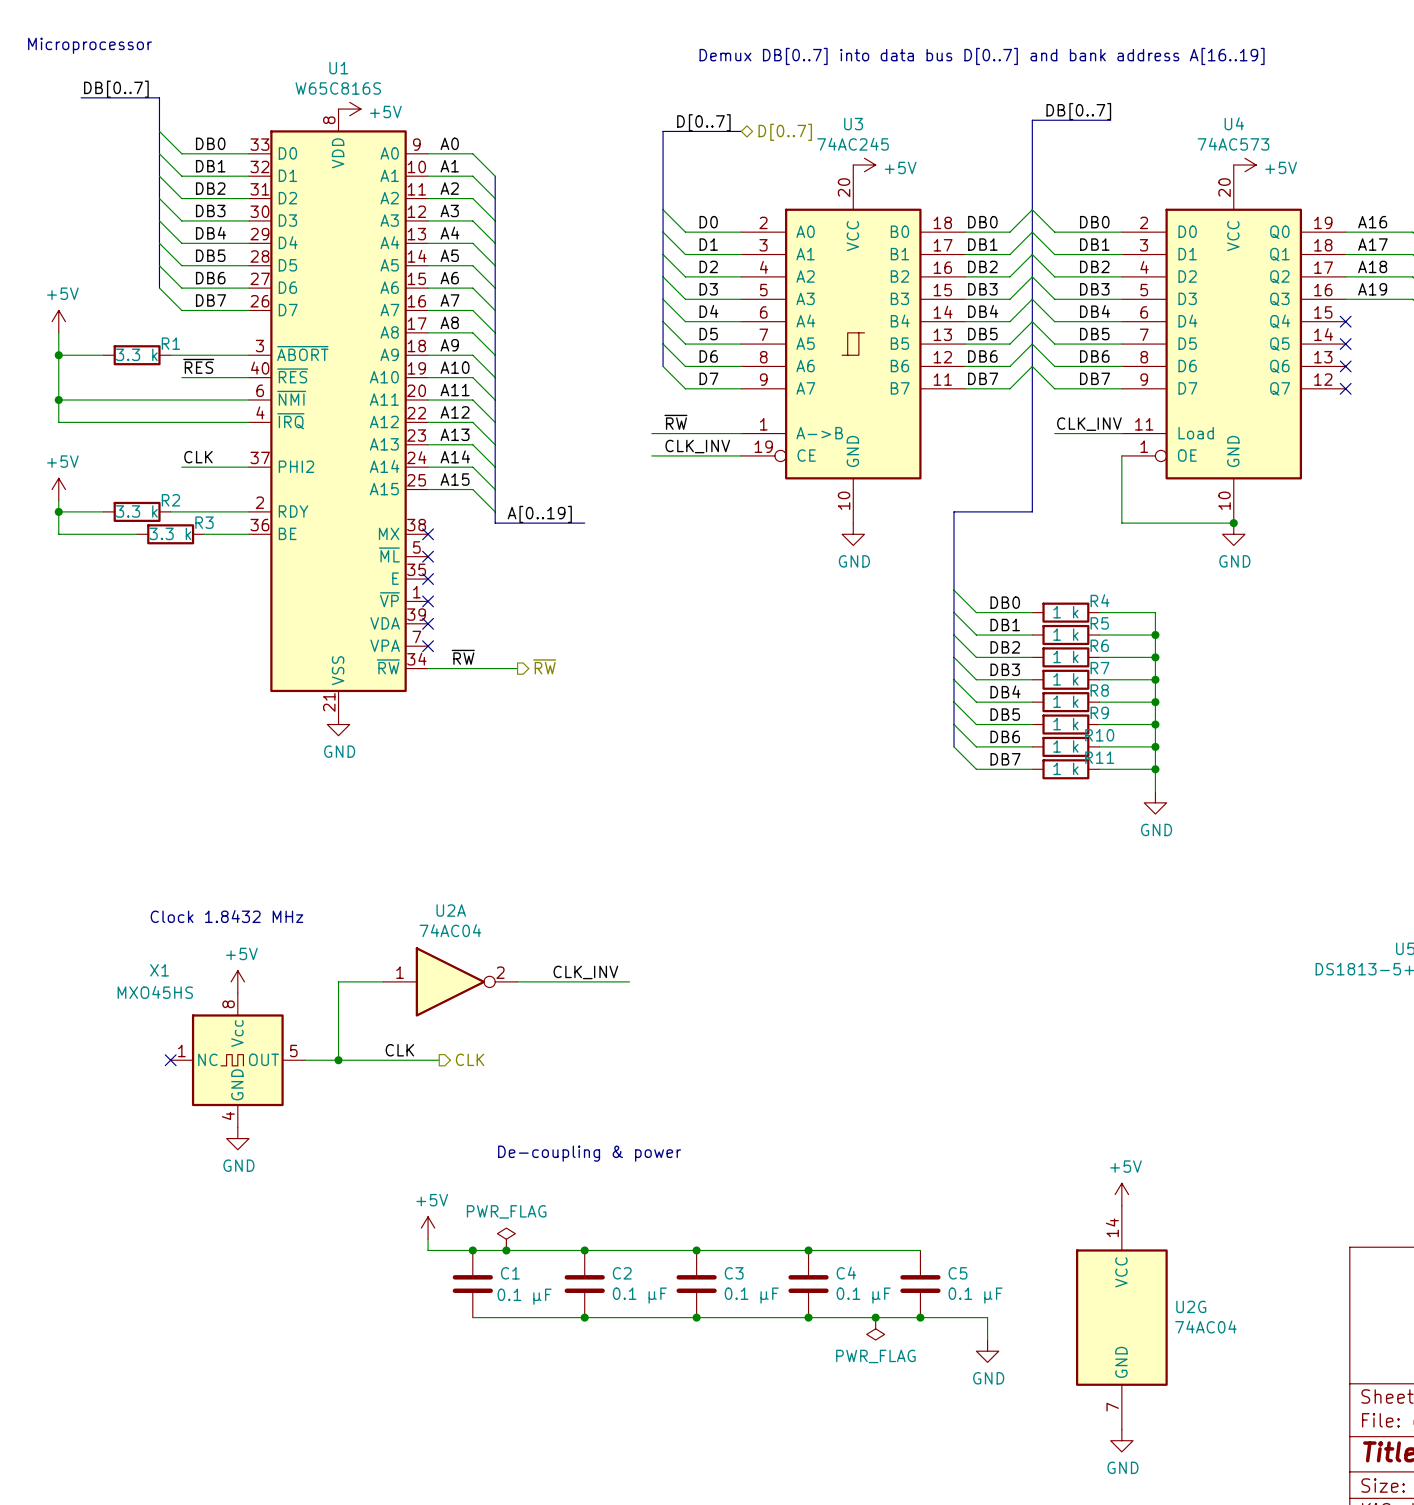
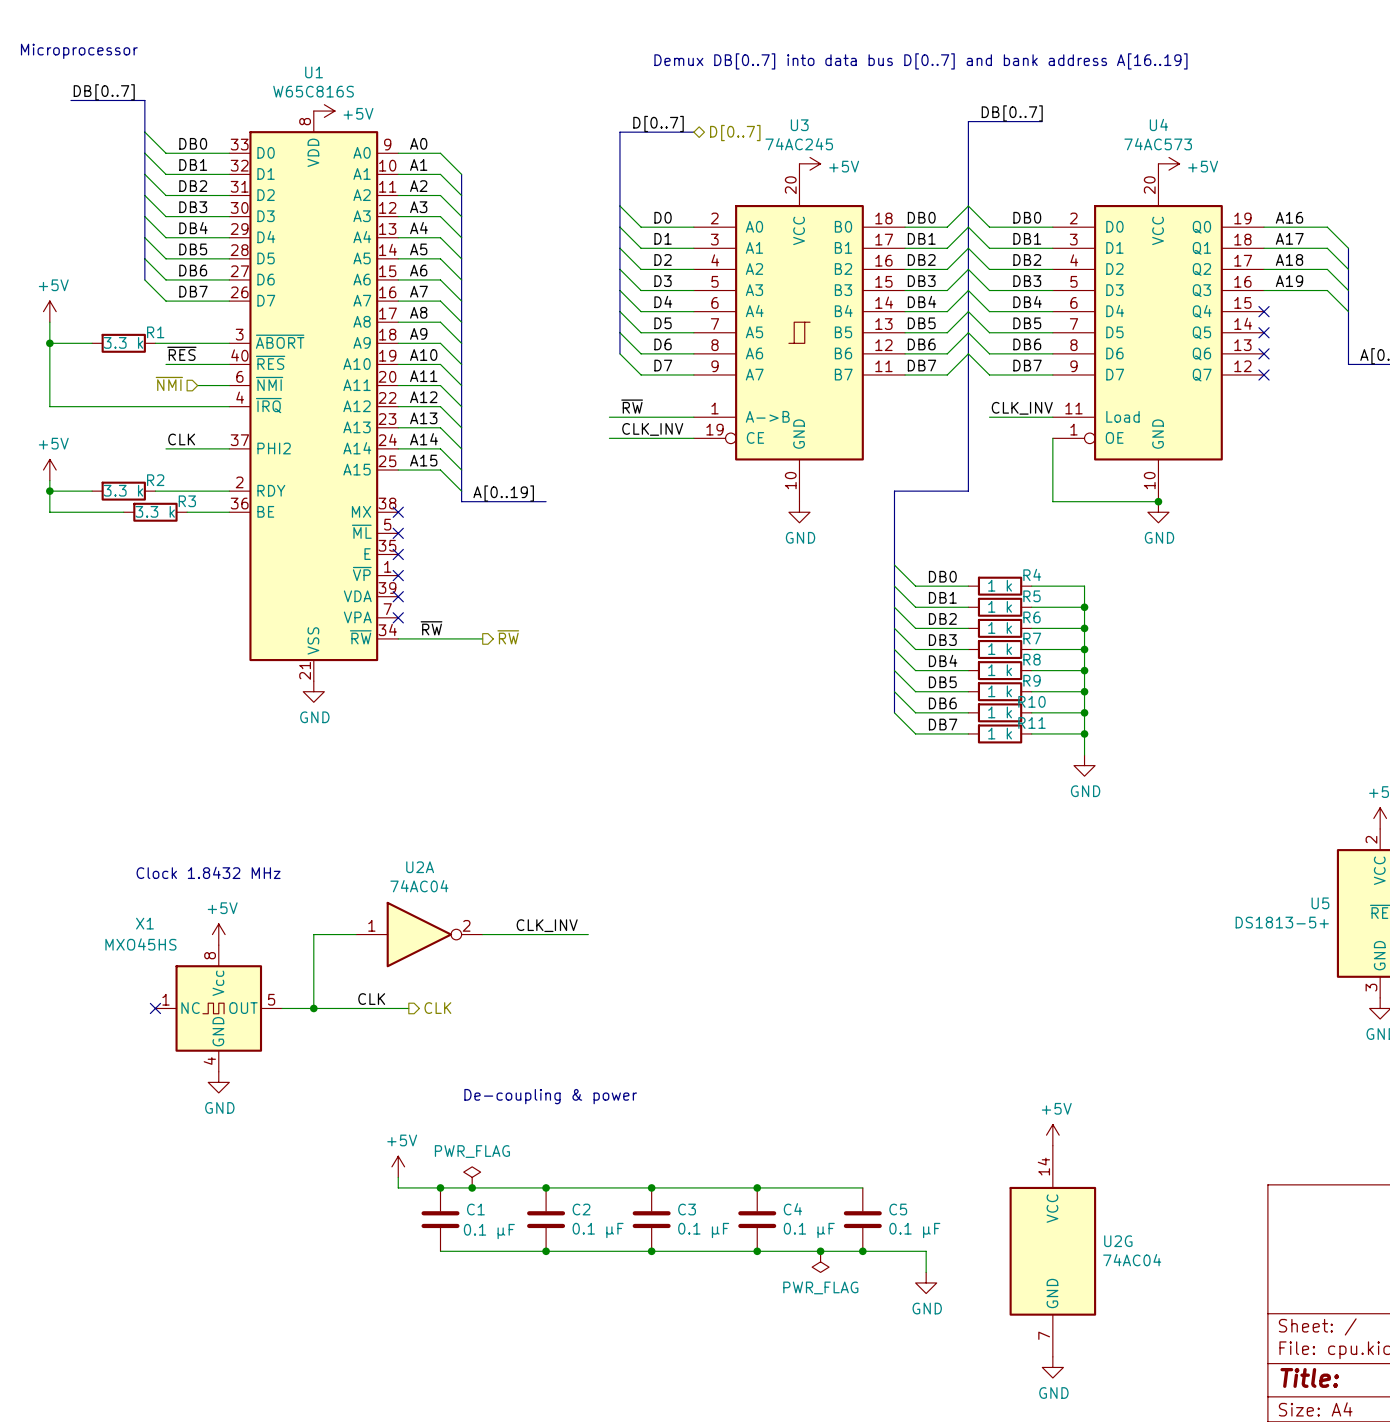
hierarchical label: none -> ~{NMI} (169, 383)
wire: (58, 400) (215, 400) -> none
junction: (58, 400) -> none

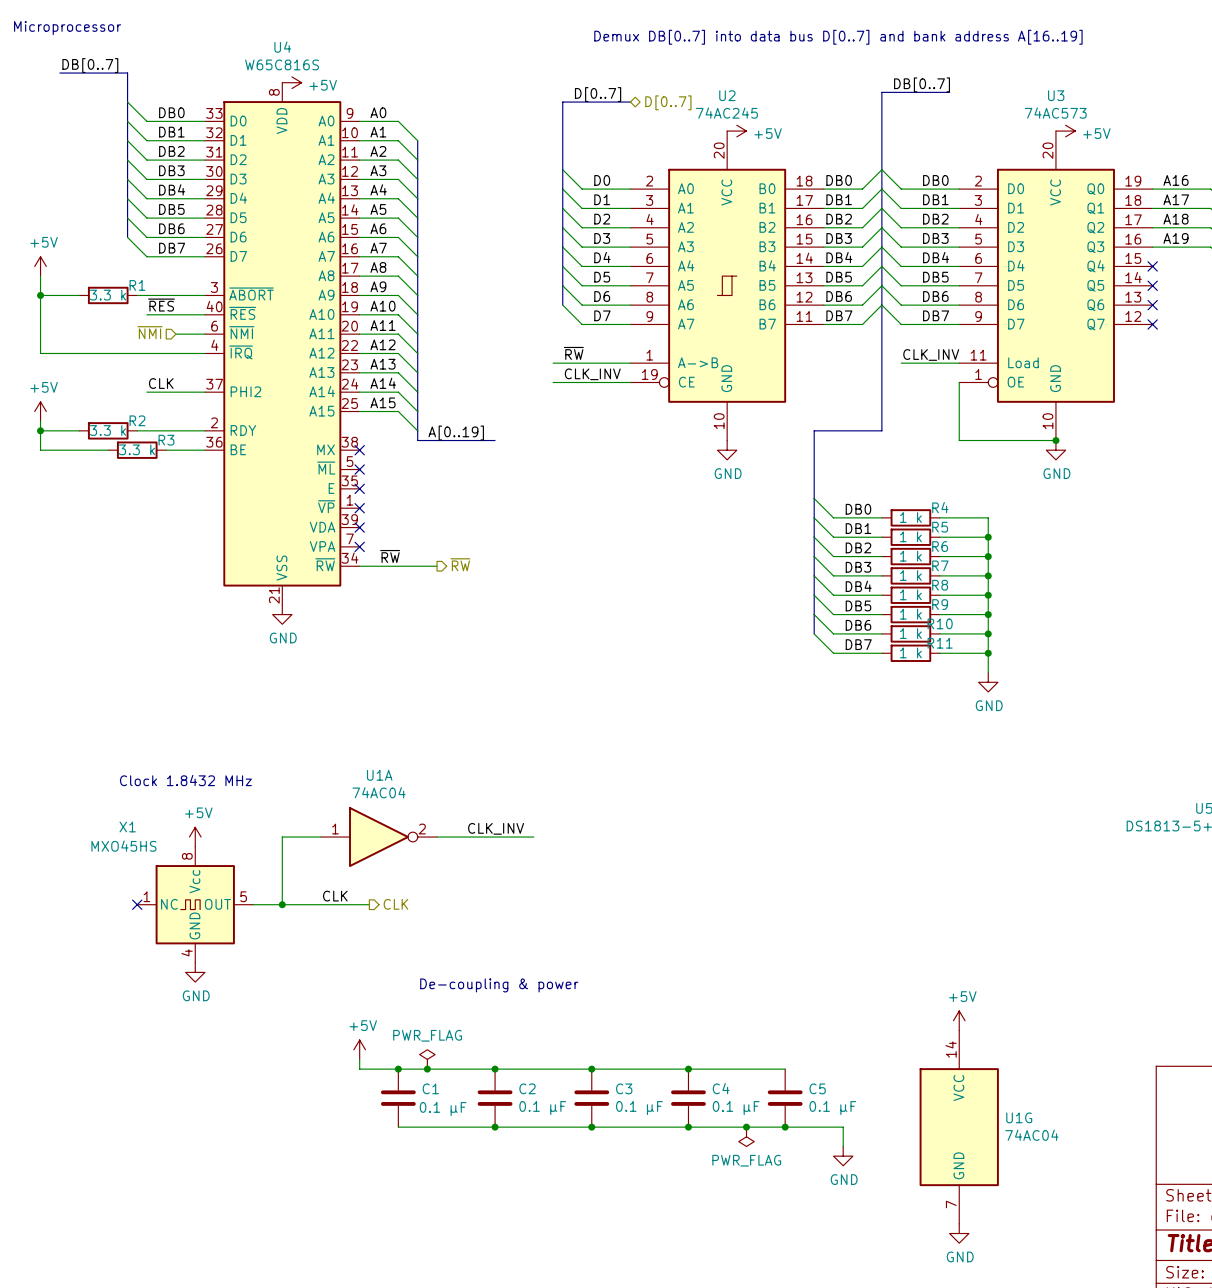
U1 name: U1 (314, 72) -> U4 (282, 47)
U4 name: U4 (1158, 124) -> U3 (1056, 95)
U3 name: U3 (799, 125) -> U2 (727, 95)
U2A name: U2A (420, 867) -> U1A (379, 775)
U2G name: U2G (1118, 1241) -> U1G (1019, 1117)

